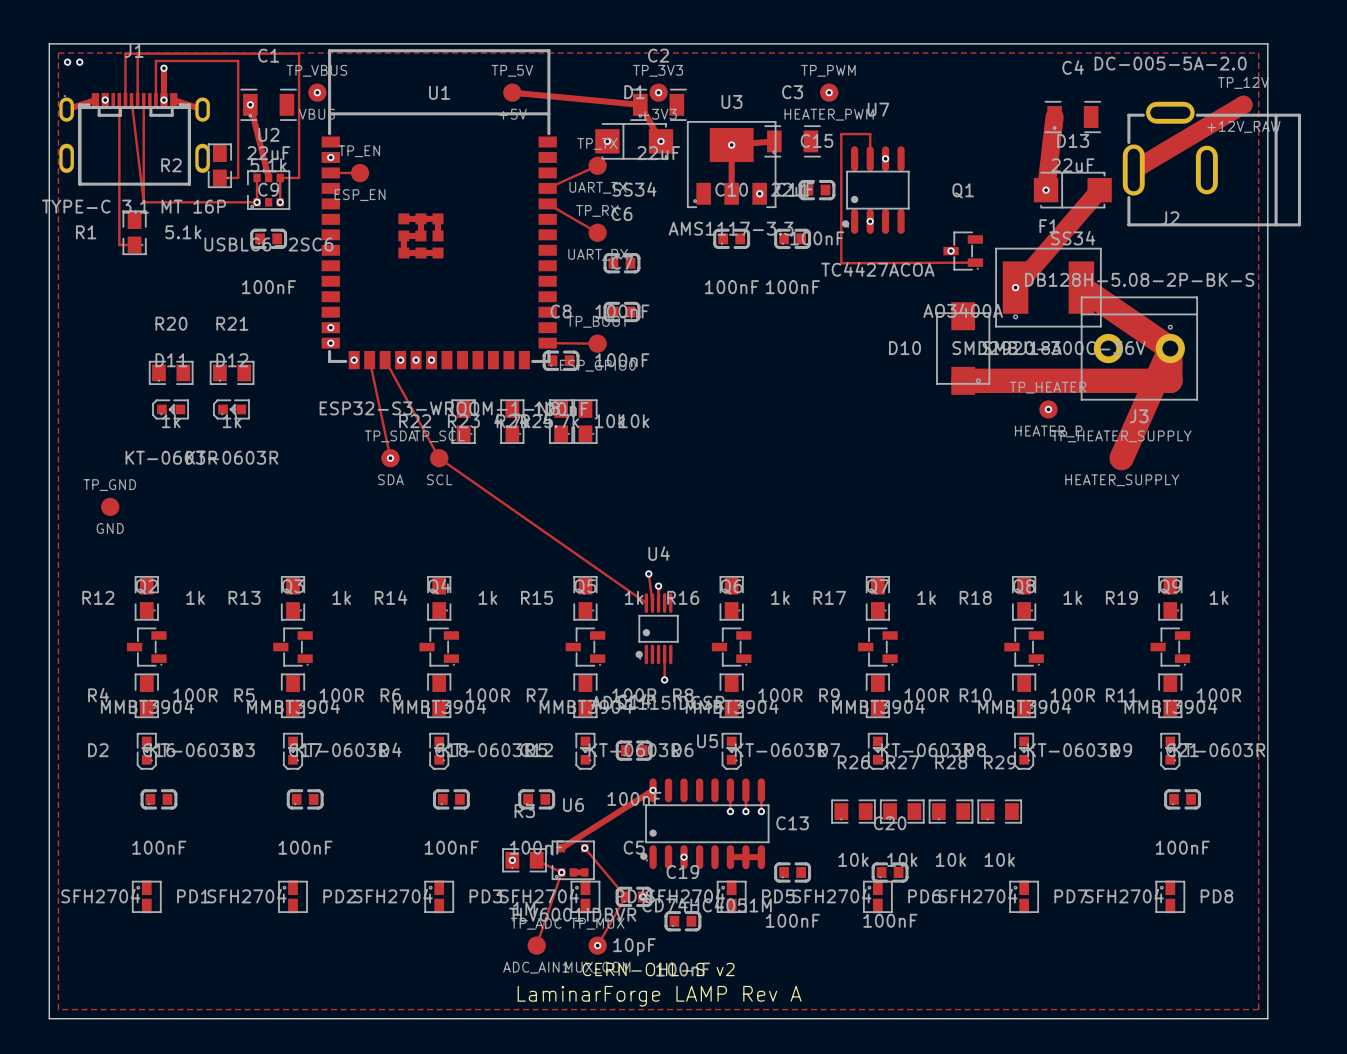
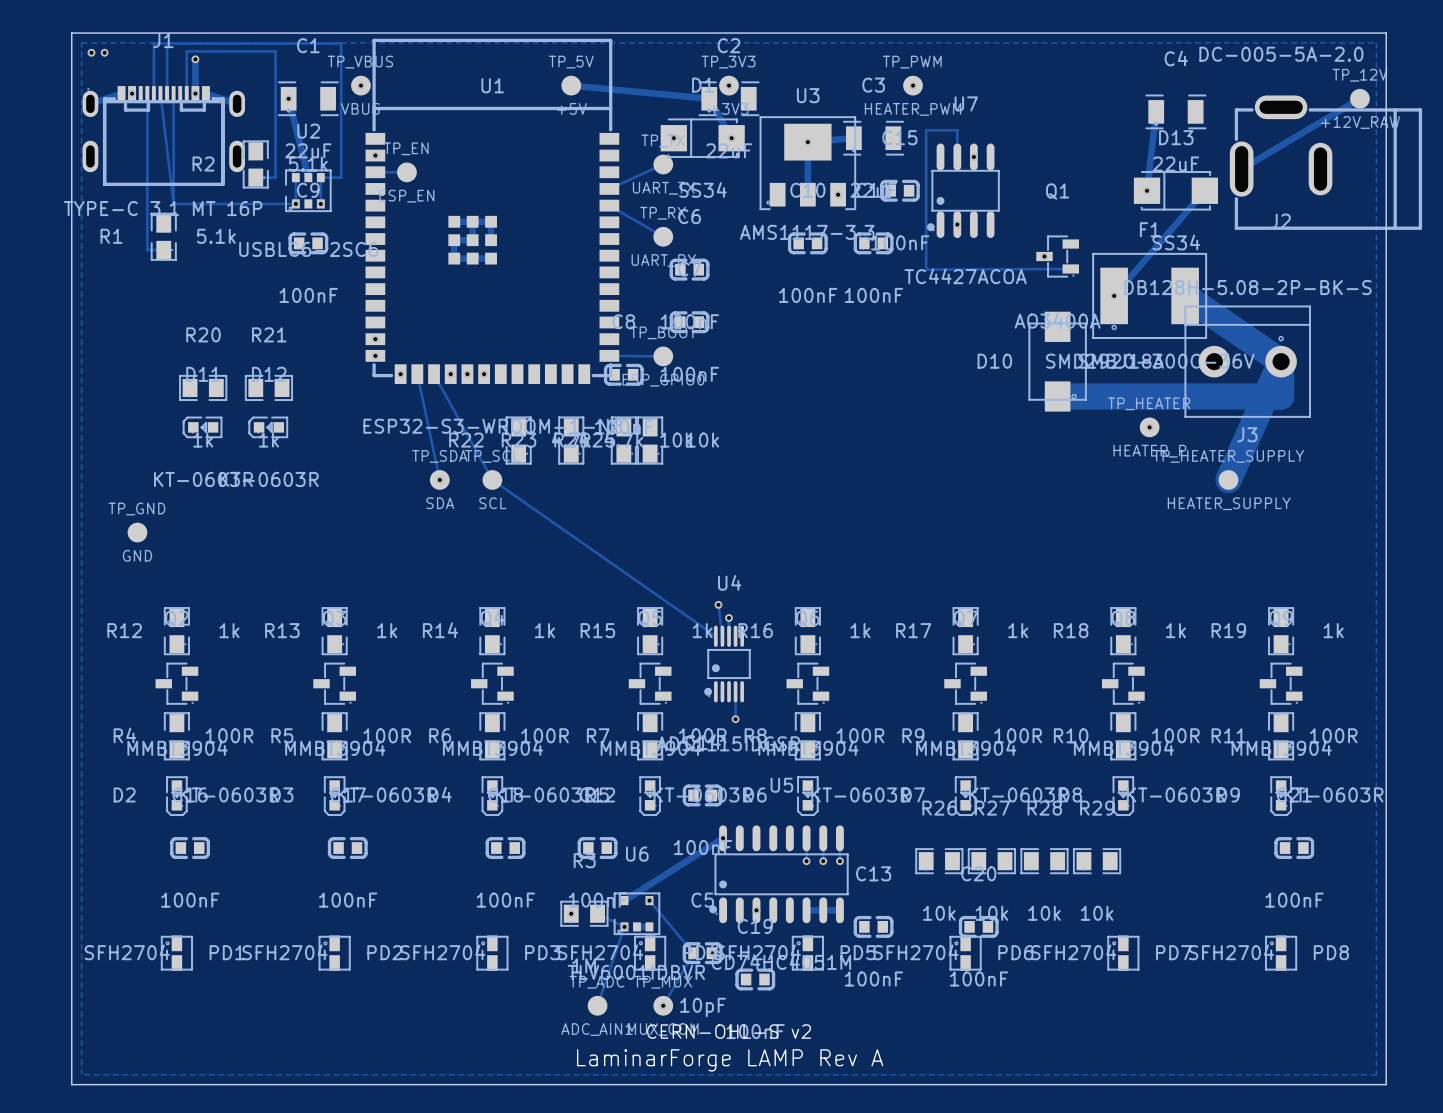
track width: thick (1243, 104) (1133, 170) -> thin (1359, 98) (1241, 169)
track width: thick (1054, 117) (1046, 190) -> thin (1156, 111) (1147, 190)
track width: thick (1099, 190) (1015, 287) -> thin (1204, 190) (1114, 295)

